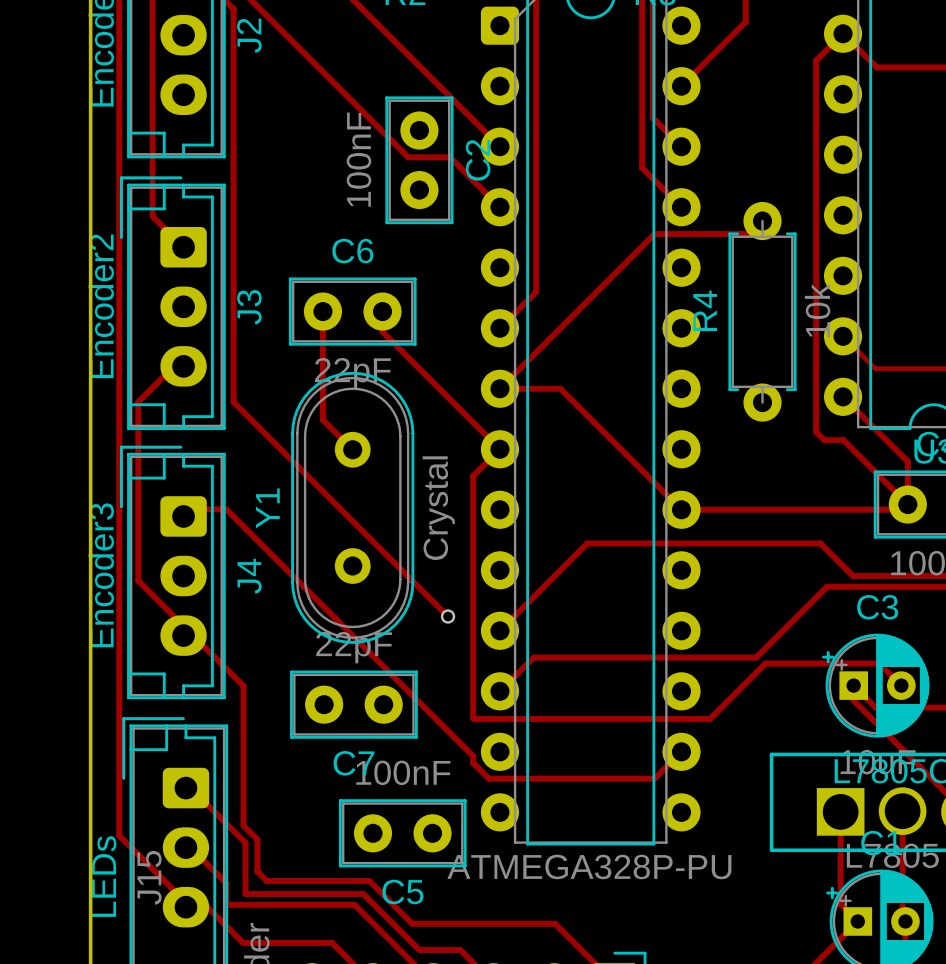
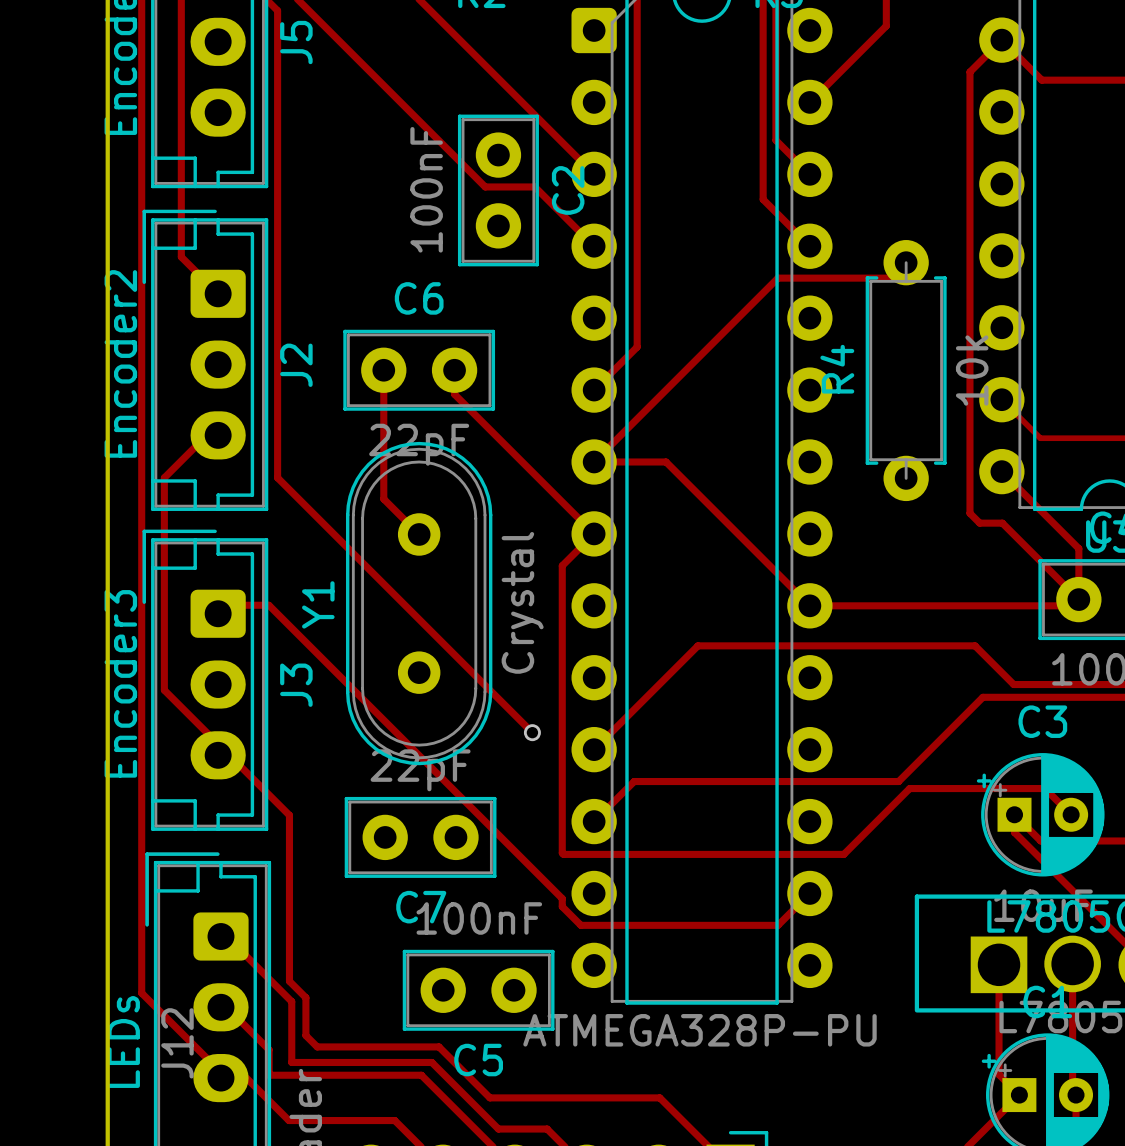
J2 name: J2 (249, 35) -> J5 (296, 42)
J3 name: J3 (249, 307) -> J2 (296, 365)
J4 name: J4 (249, 576) -> J3 (296, 685)
J15 name: J15 (149, 877) -> J12 (177, 1043)

